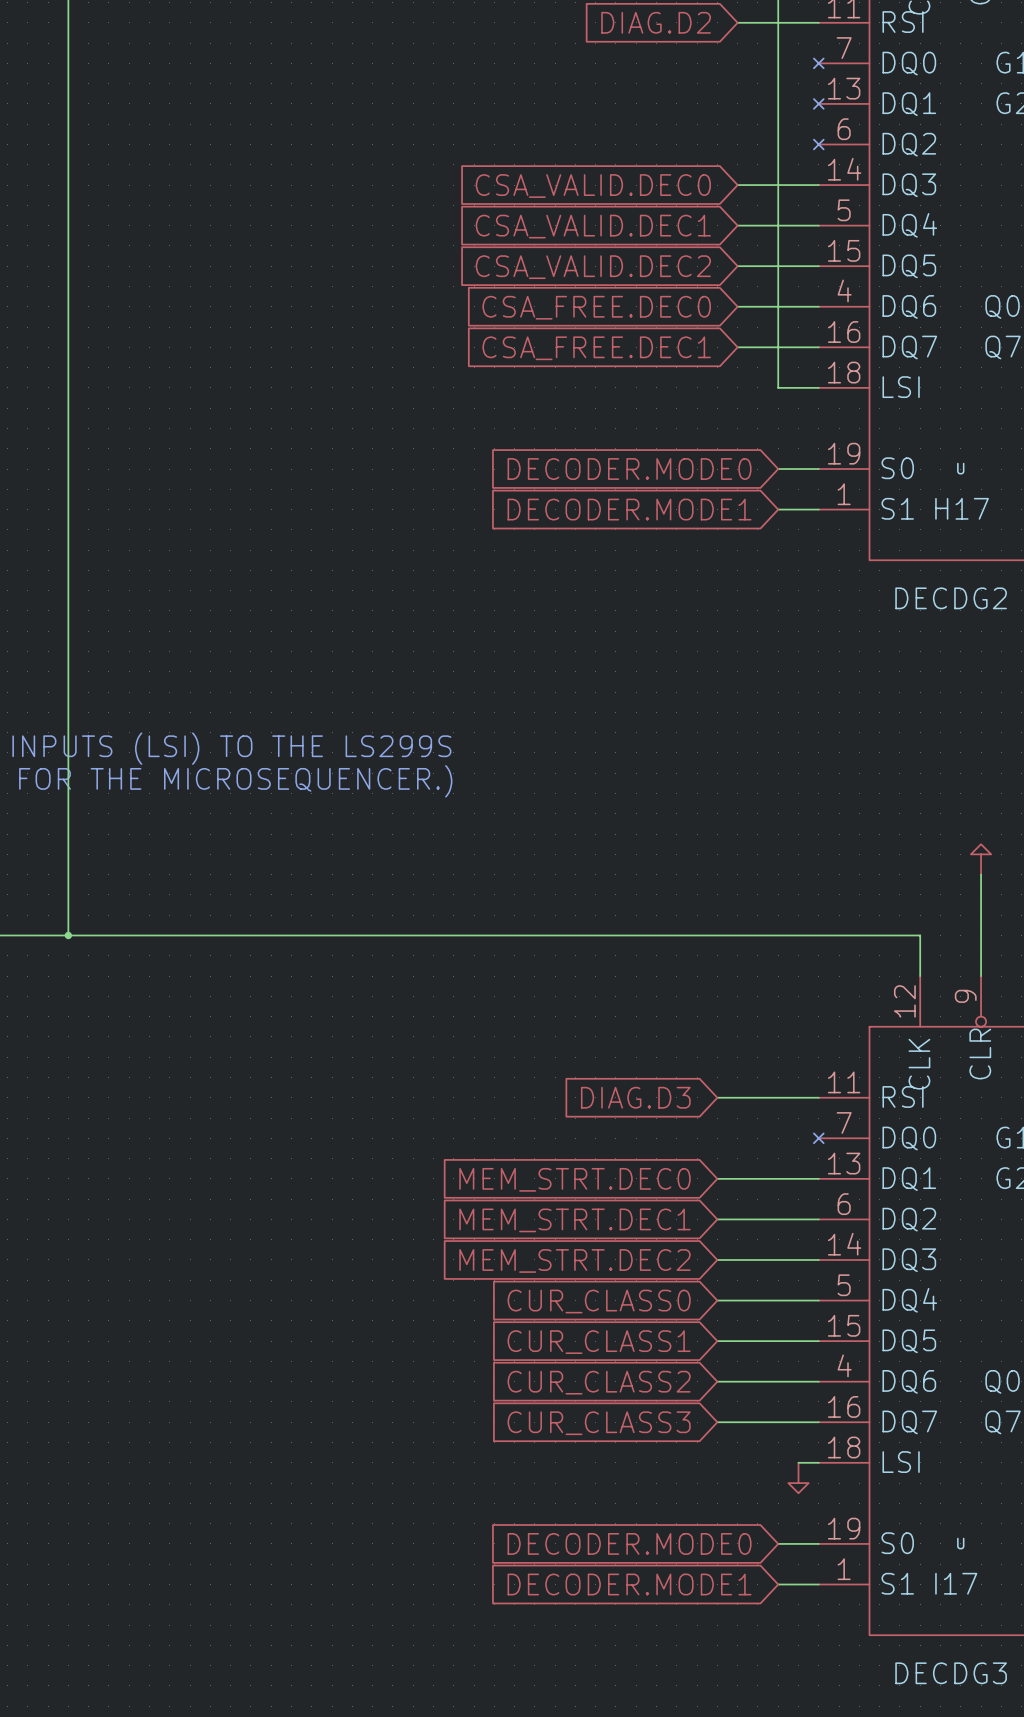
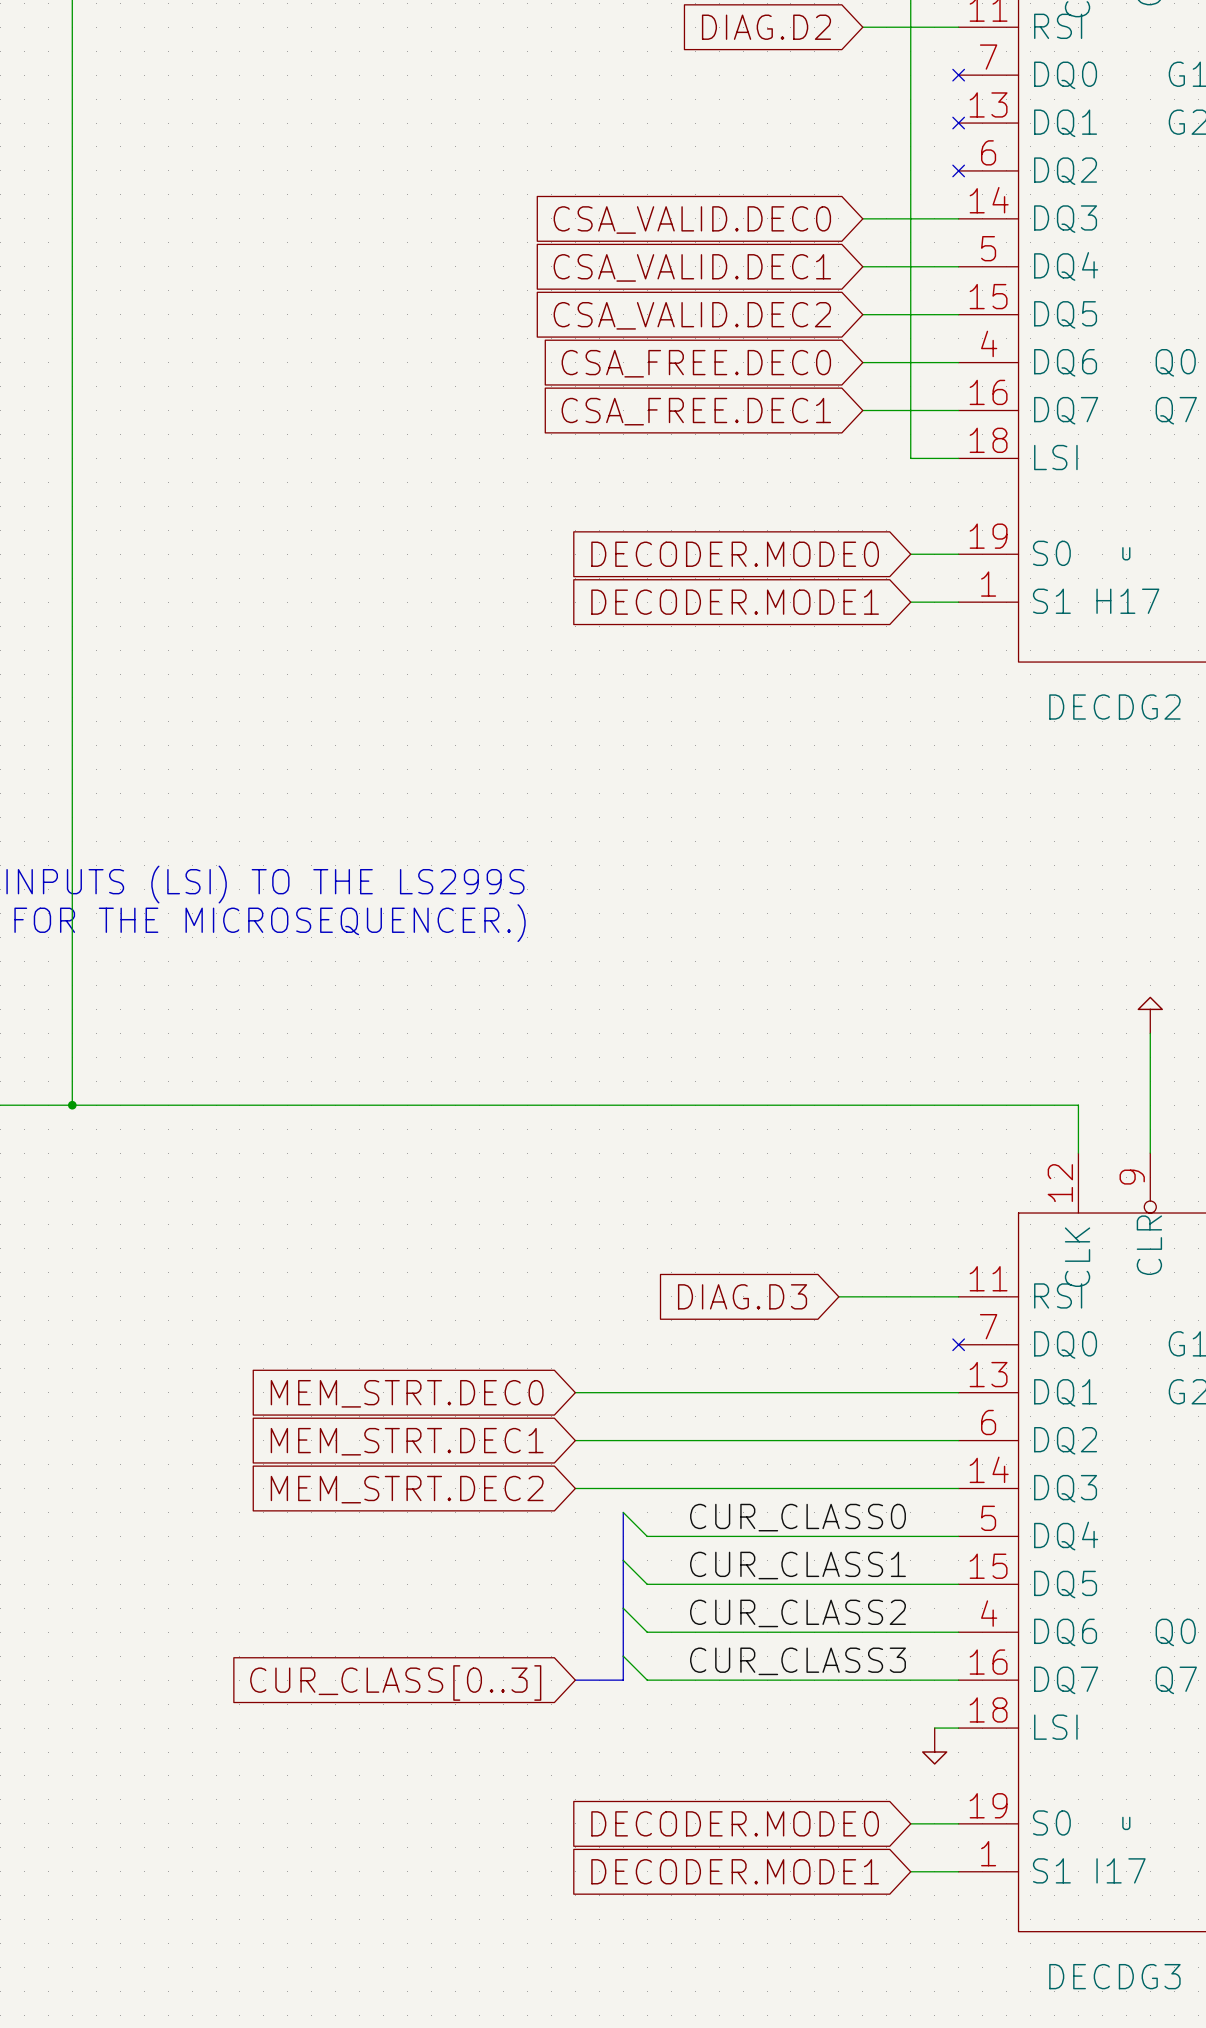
wire: none -> (575, 1392) (838, 1392)
global label: none -> MEM_STRT.DEC0 (407, 1393)
global label: MEM_STRT.DEC0 (574, 1179) -> none
wire: none -> (575, 1440) (838, 1440)
global label: none -> MEM_STRT.DEC1 (407, 1441)
global label: MEM_STRT.DEC1 (574, 1220) -> none
wire: none -> (575, 1488) (838, 1488)
global label: none -> MEM_STRT.DEC2 (407, 1489)
global label: MEM_STRT.DEC2 (574, 1260) -> none
wire: none -> (623, 1512) (647, 1536) (838, 1536)
bus: none -> (623, 1512) (623, 1680) (575, 1680)
label: none -> CUR_CLASS0 (798, 1517)
global label: CUR_CLASS0 (599, 1301) -> none
wire: none -> (623, 1560) (647, 1584) (838, 1584)
label: none -> CUR_CLASS1 (798, 1565)
global label: CUR_CLASS1 (599, 1342) -> none
wire: none -> (623, 1608) (647, 1632) (838, 1632)
label: none -> CUR_CLASS2 (798, 1613)
global label: CUR_CLASS2 (599, 1382) -> none
wire: none -> (623, 1656) (647, 1680) (838, 1680)
label: none -> CUR_CLASS3 (798, 1661)
global label: CUR_CLASS3 (599, 1423) -> none
global label: none -> CUR_CLASS[0..3] (395, 1682)

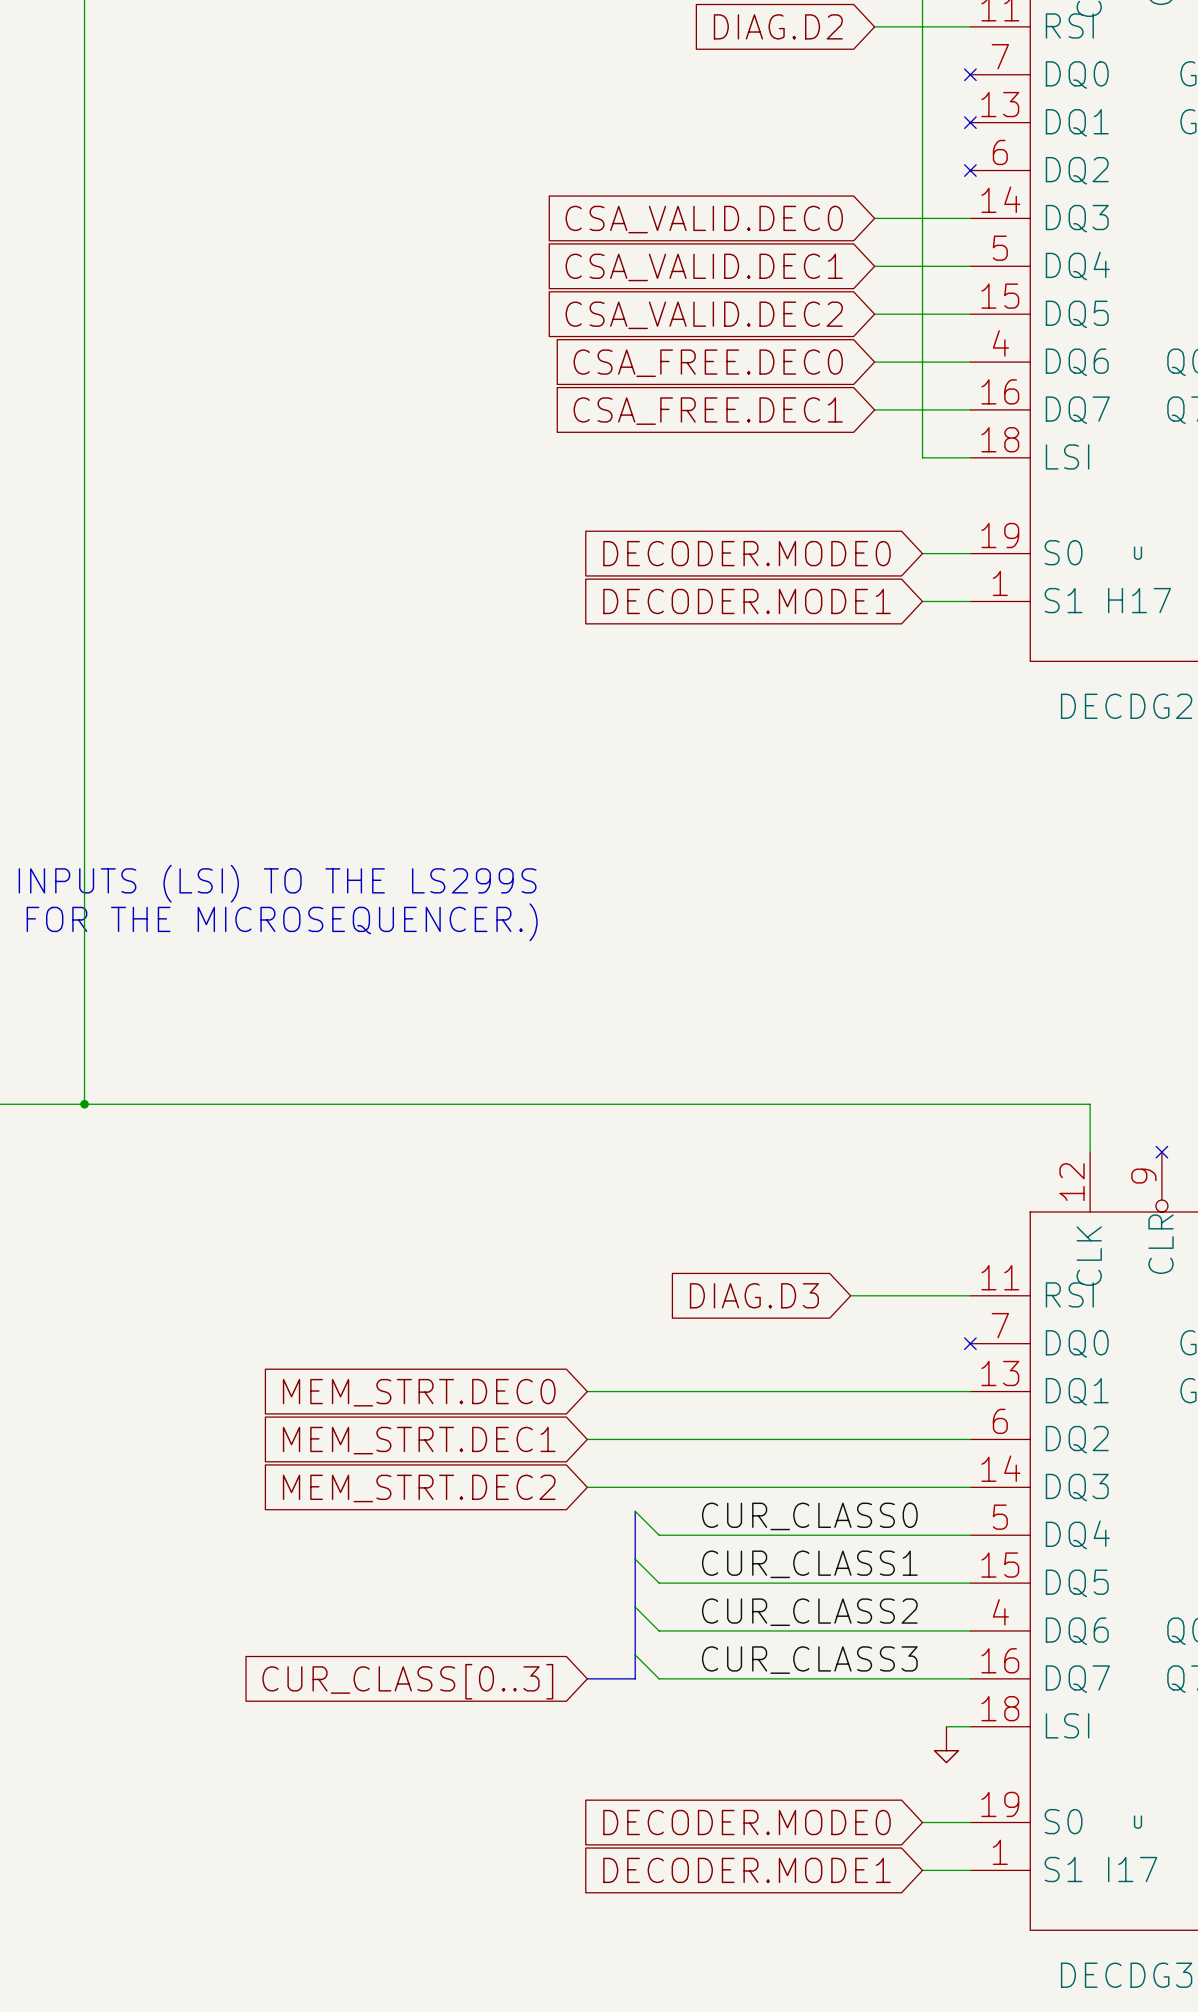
power symbol: (1150, 1015) -> none
wire: (1150, 1033) (1150, 1153) -> none
no-connect mark: none -> (1161, 1152)

